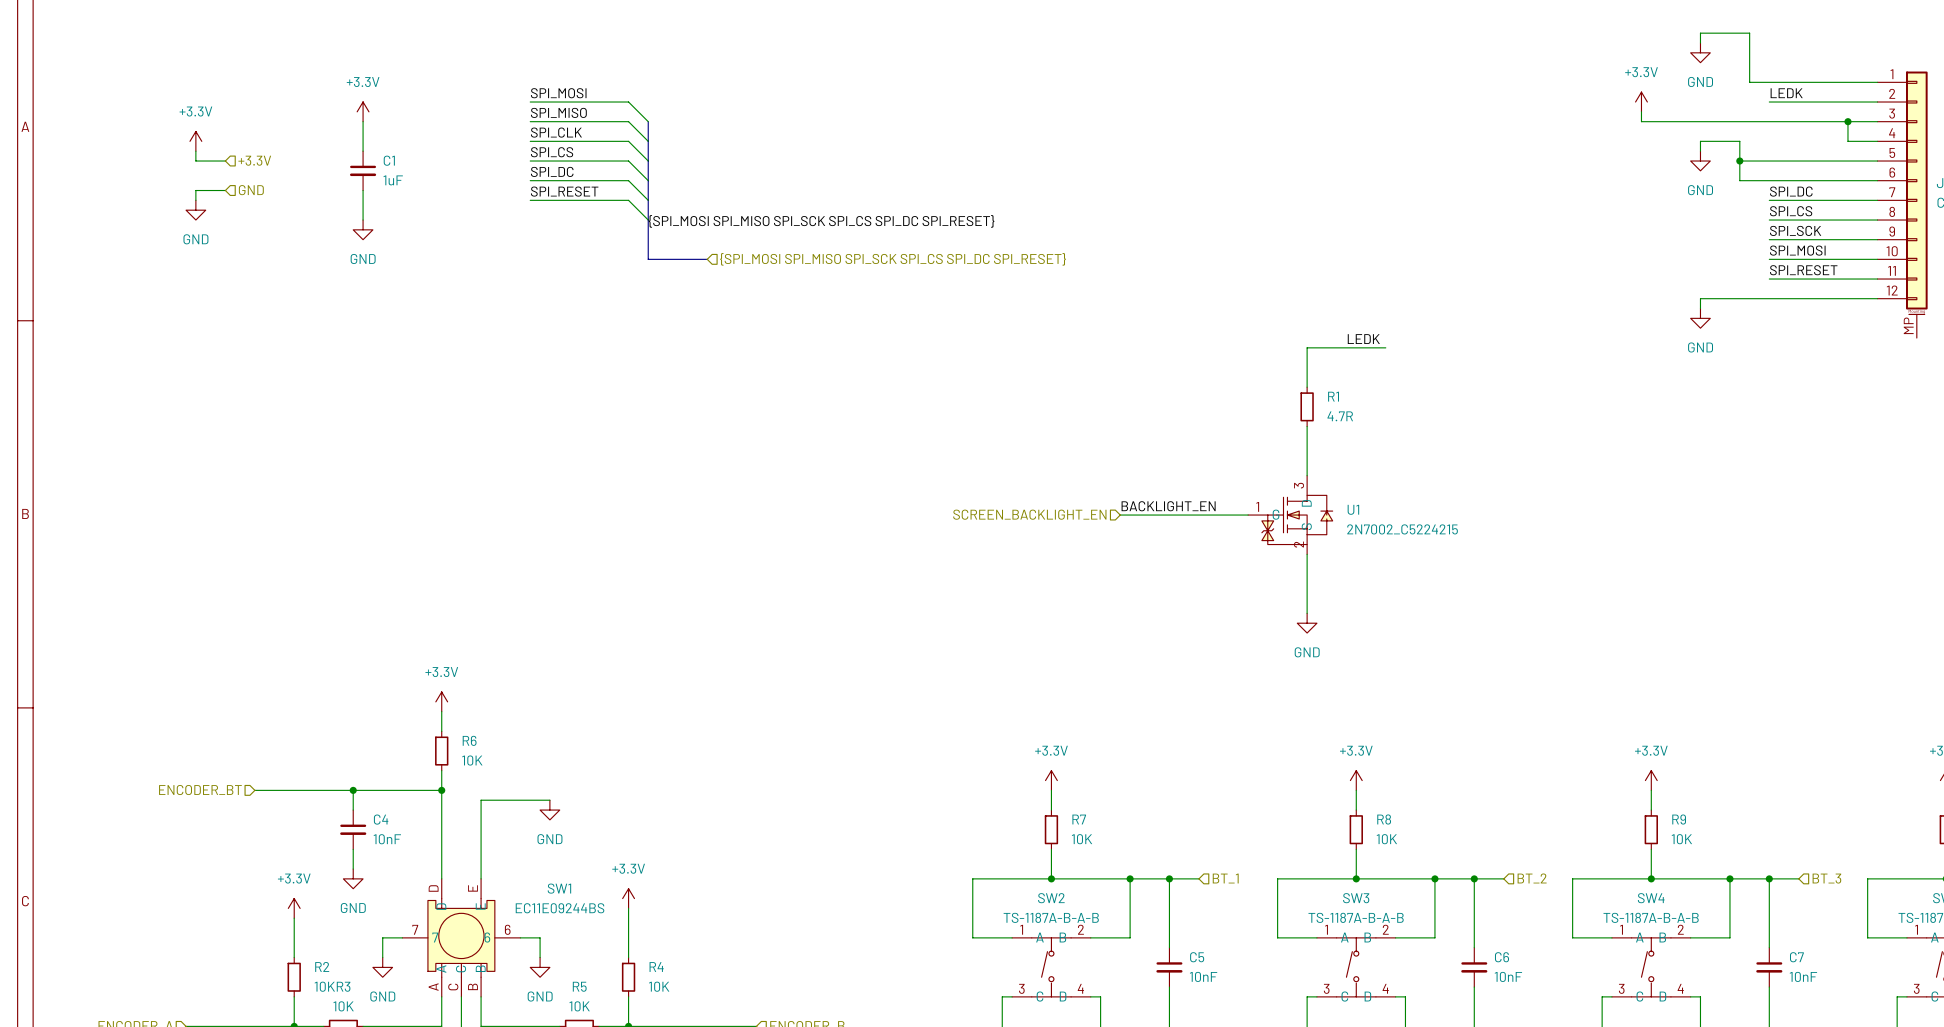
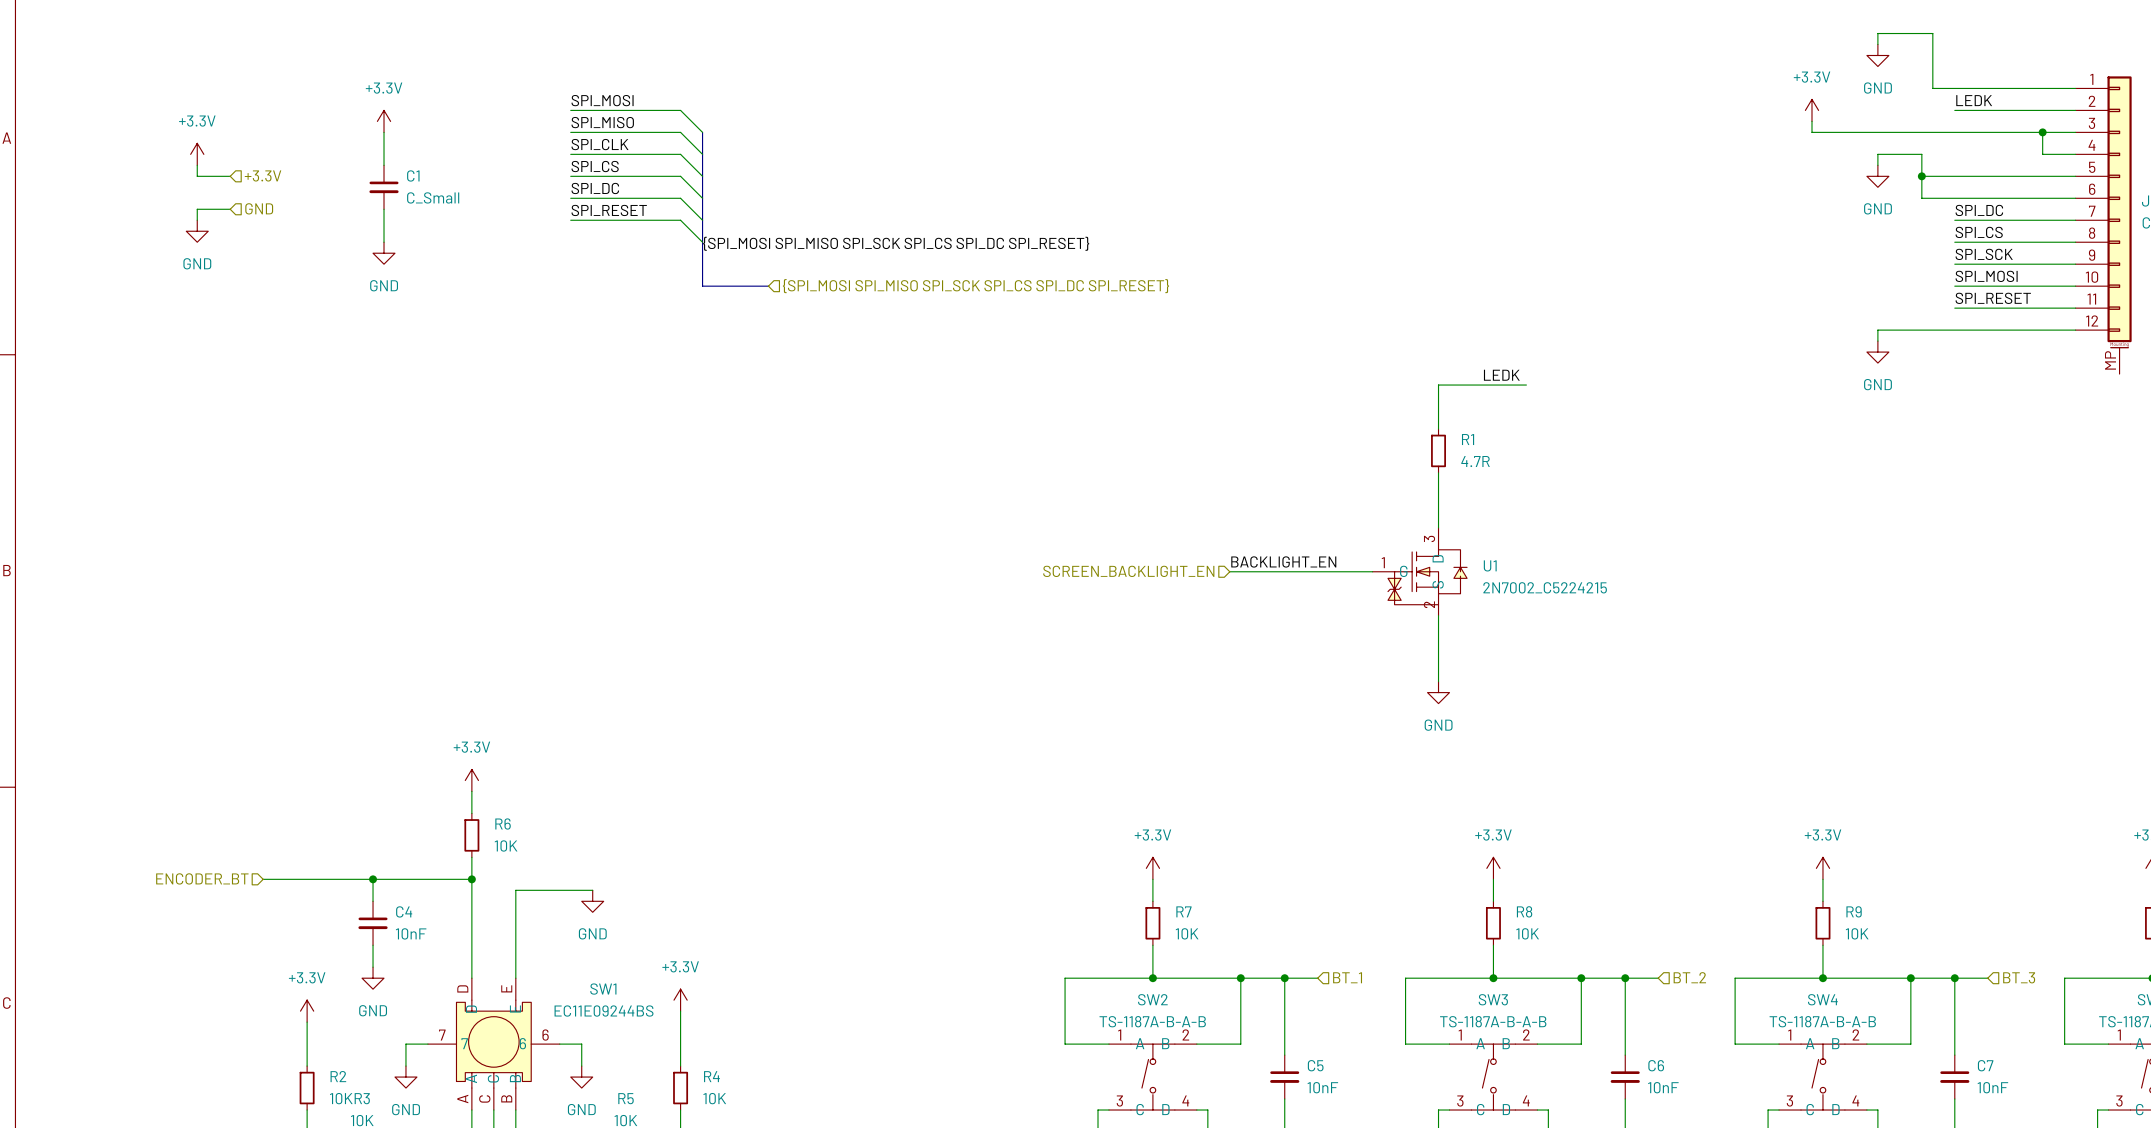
C1 value: 1uF (393, 180) -> C_Small (433, 197)

